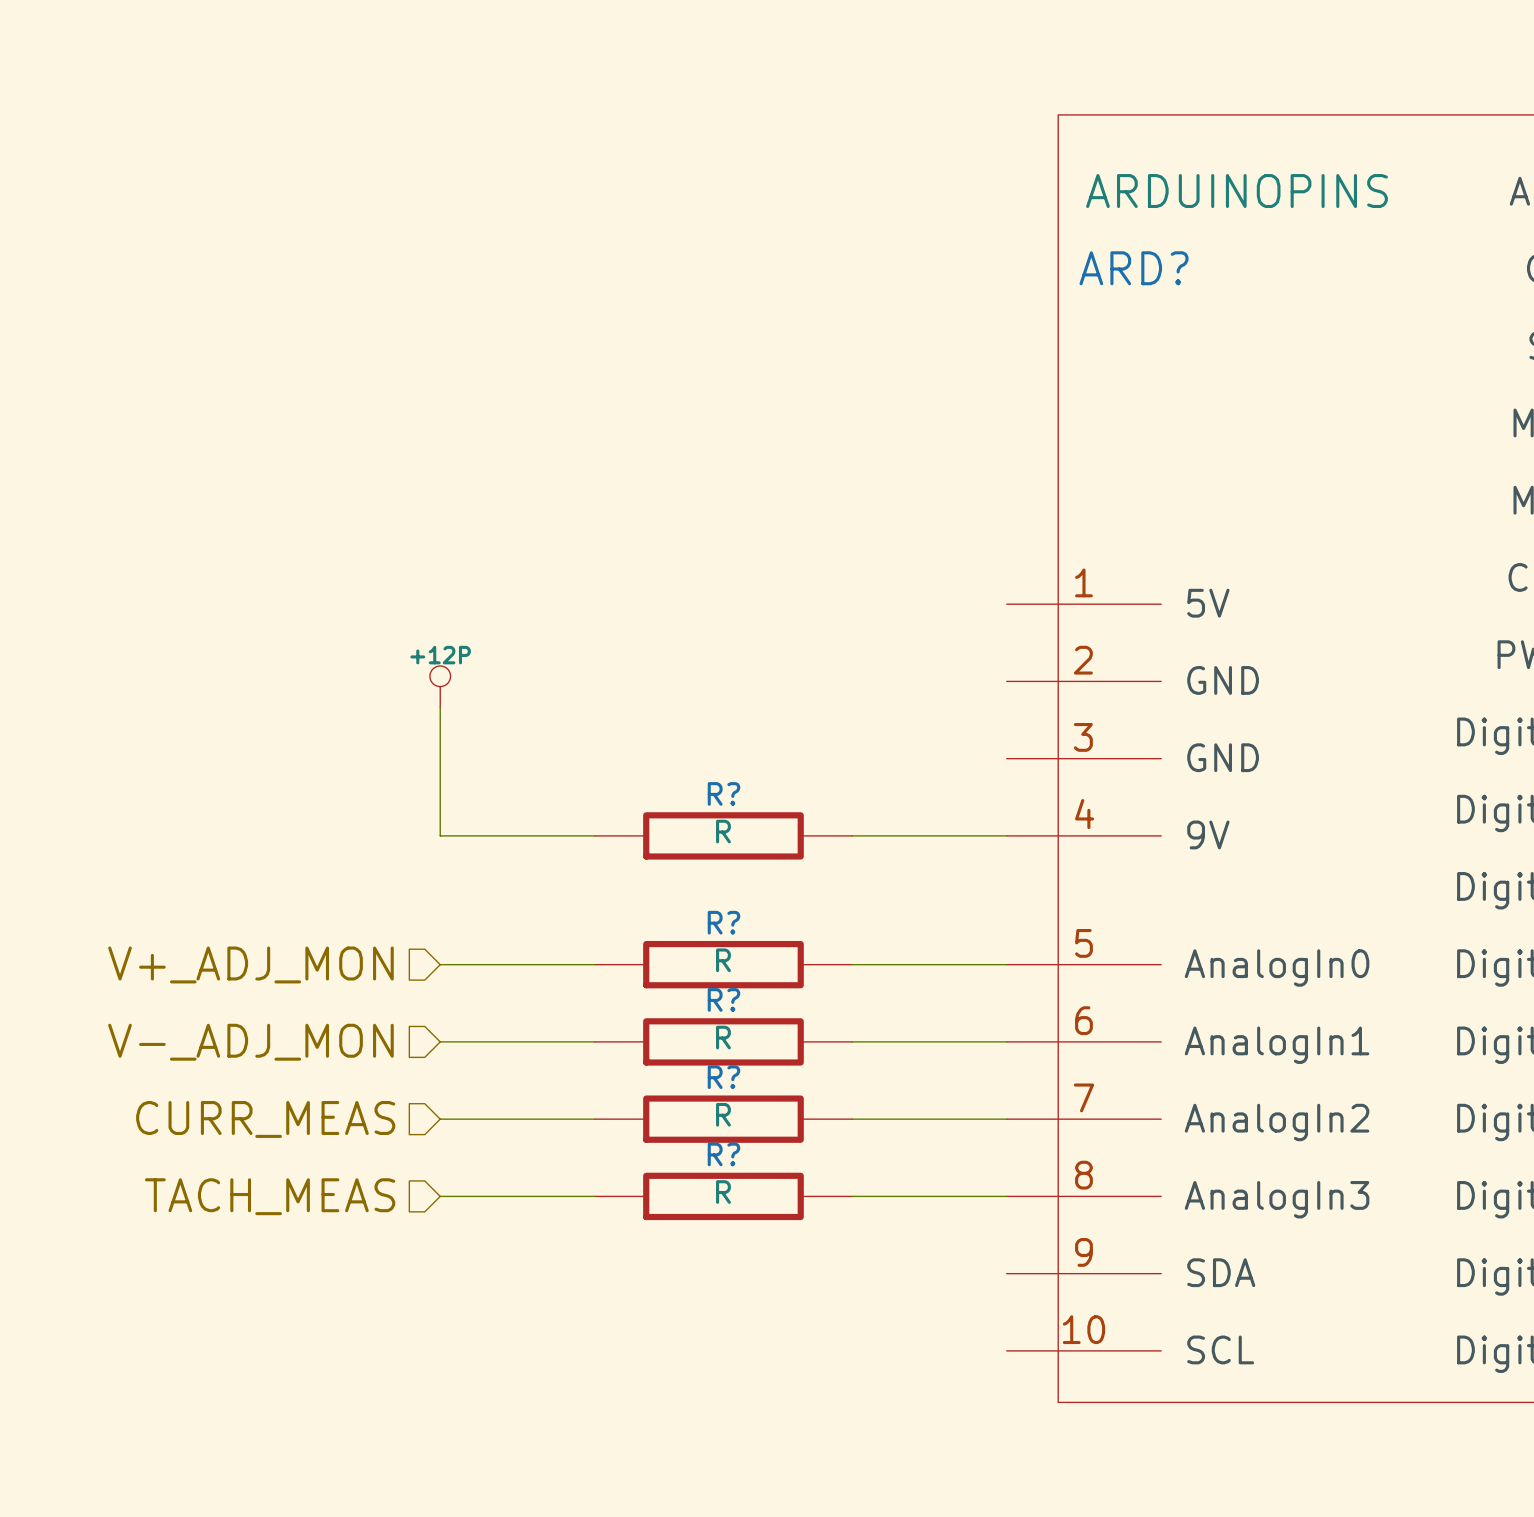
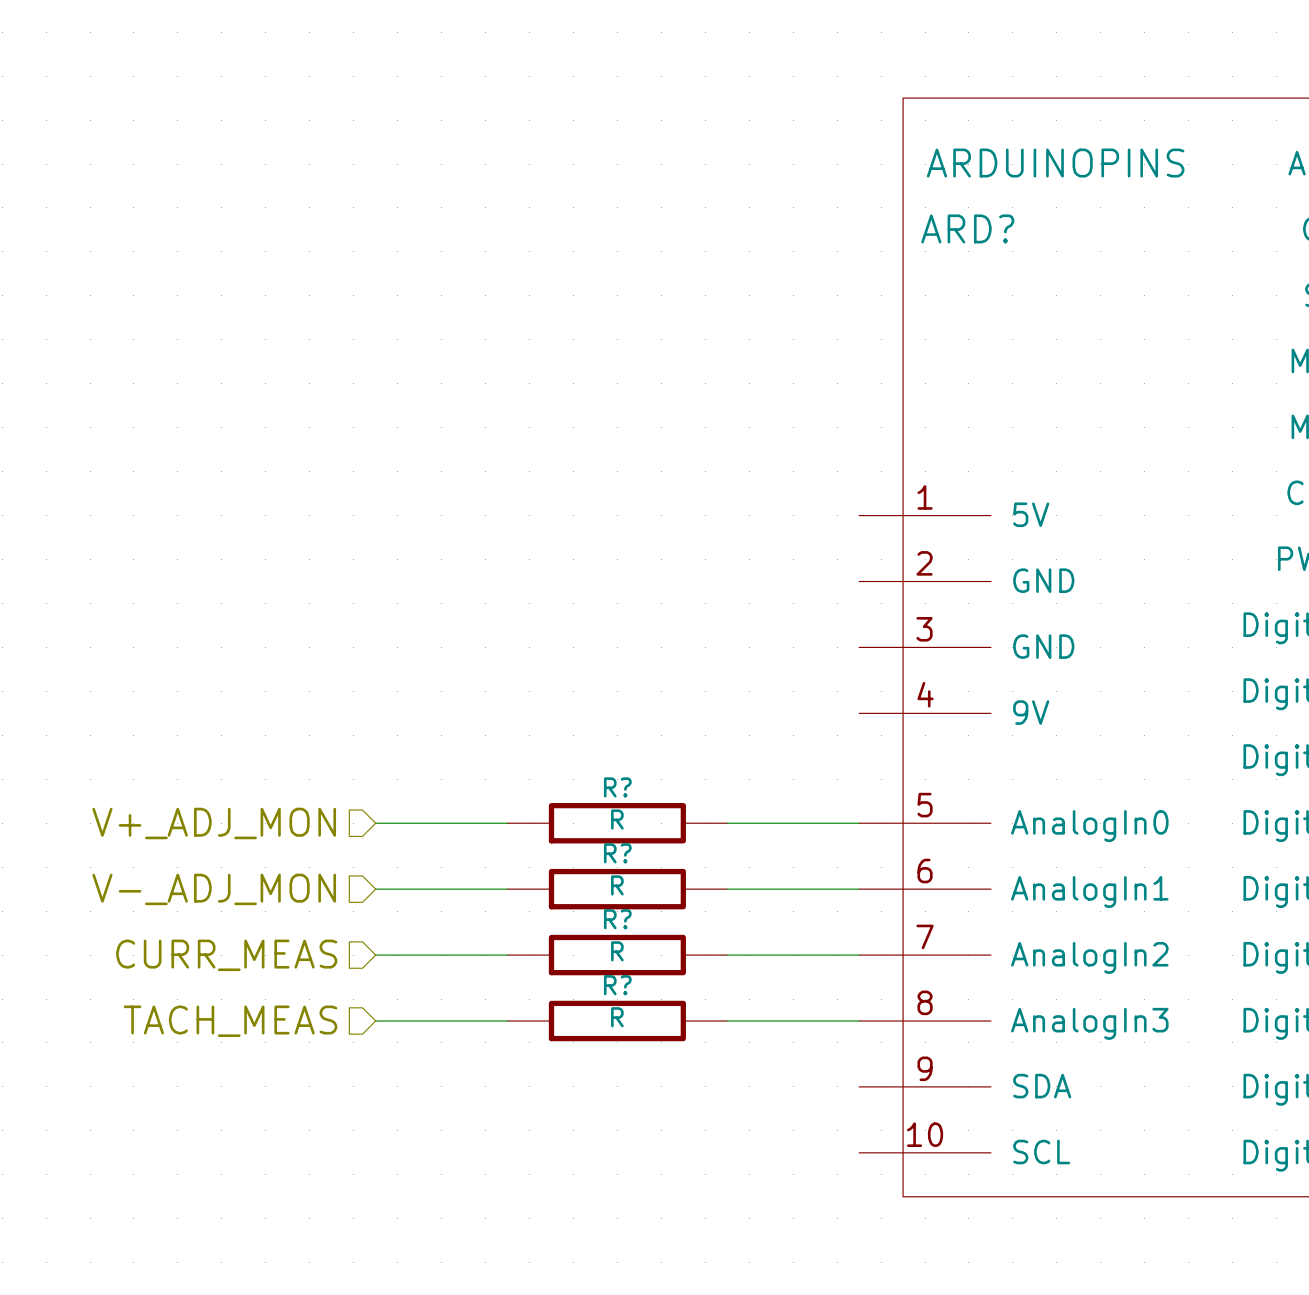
power symbol: +12P (440, 686) -> none
wire: (440, 707) (440, 835) (594, 835) -> none
R?: R (723, 835) -> none
wire: (852, 835) (1006, 835) -> none

